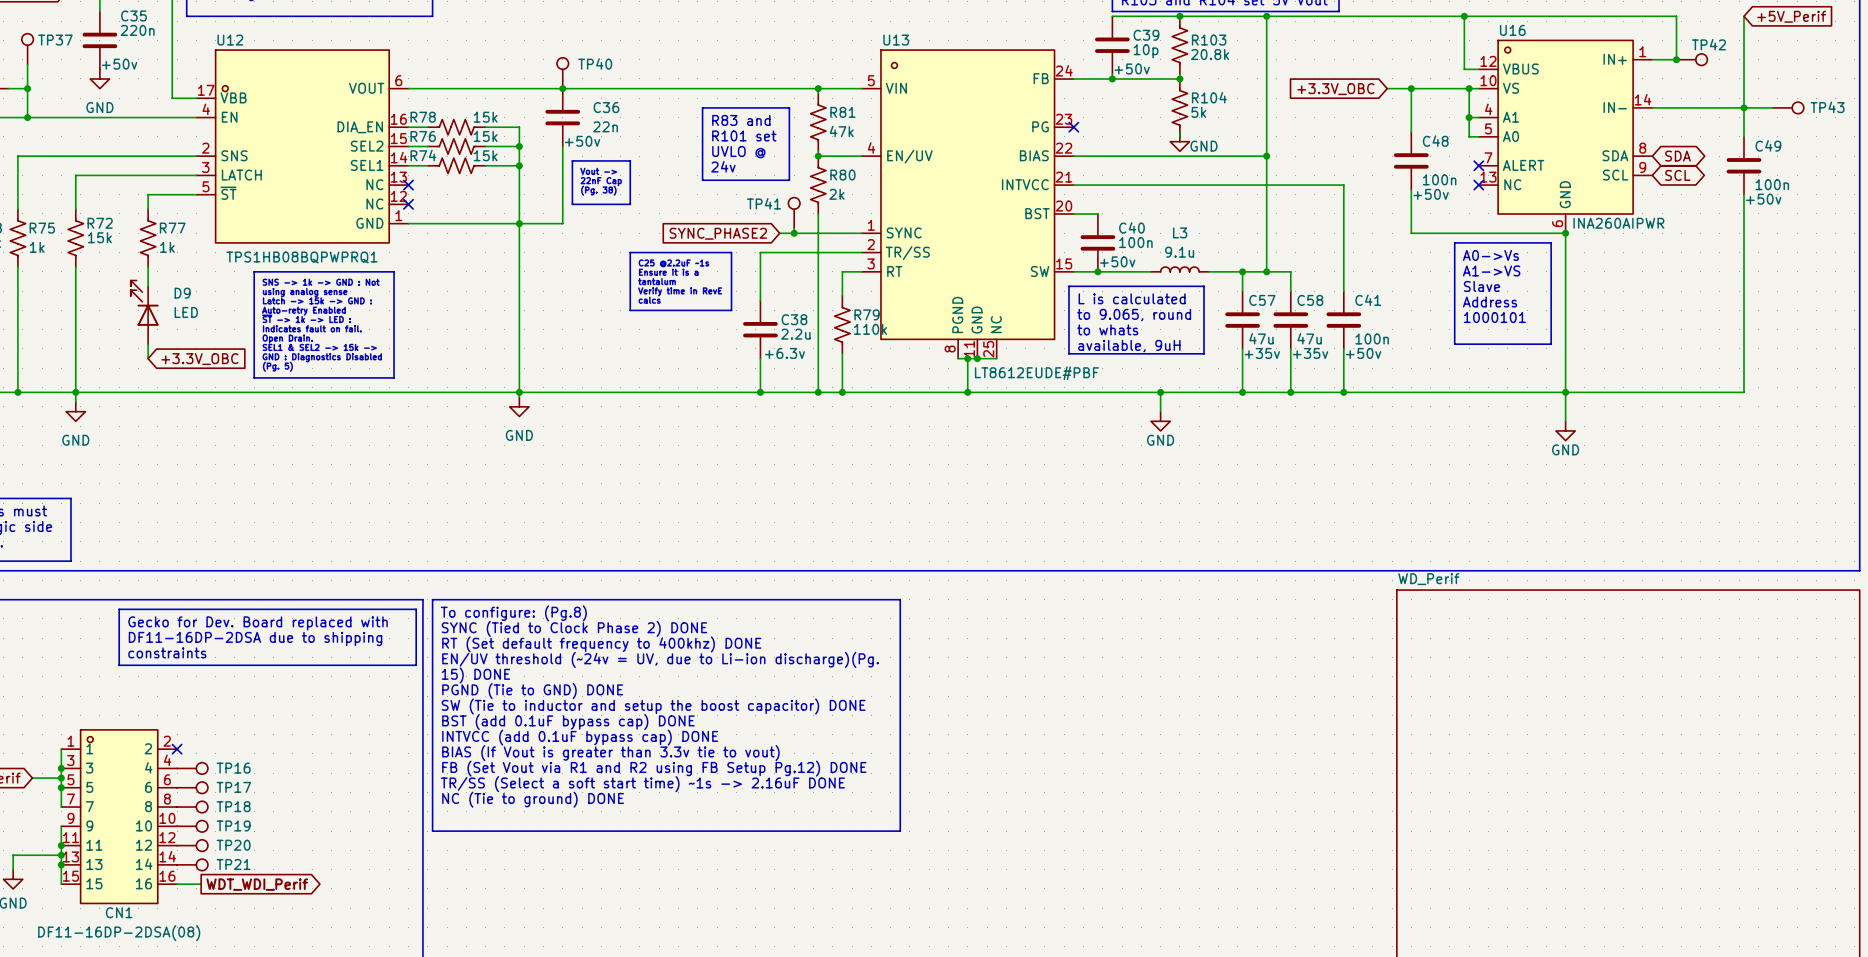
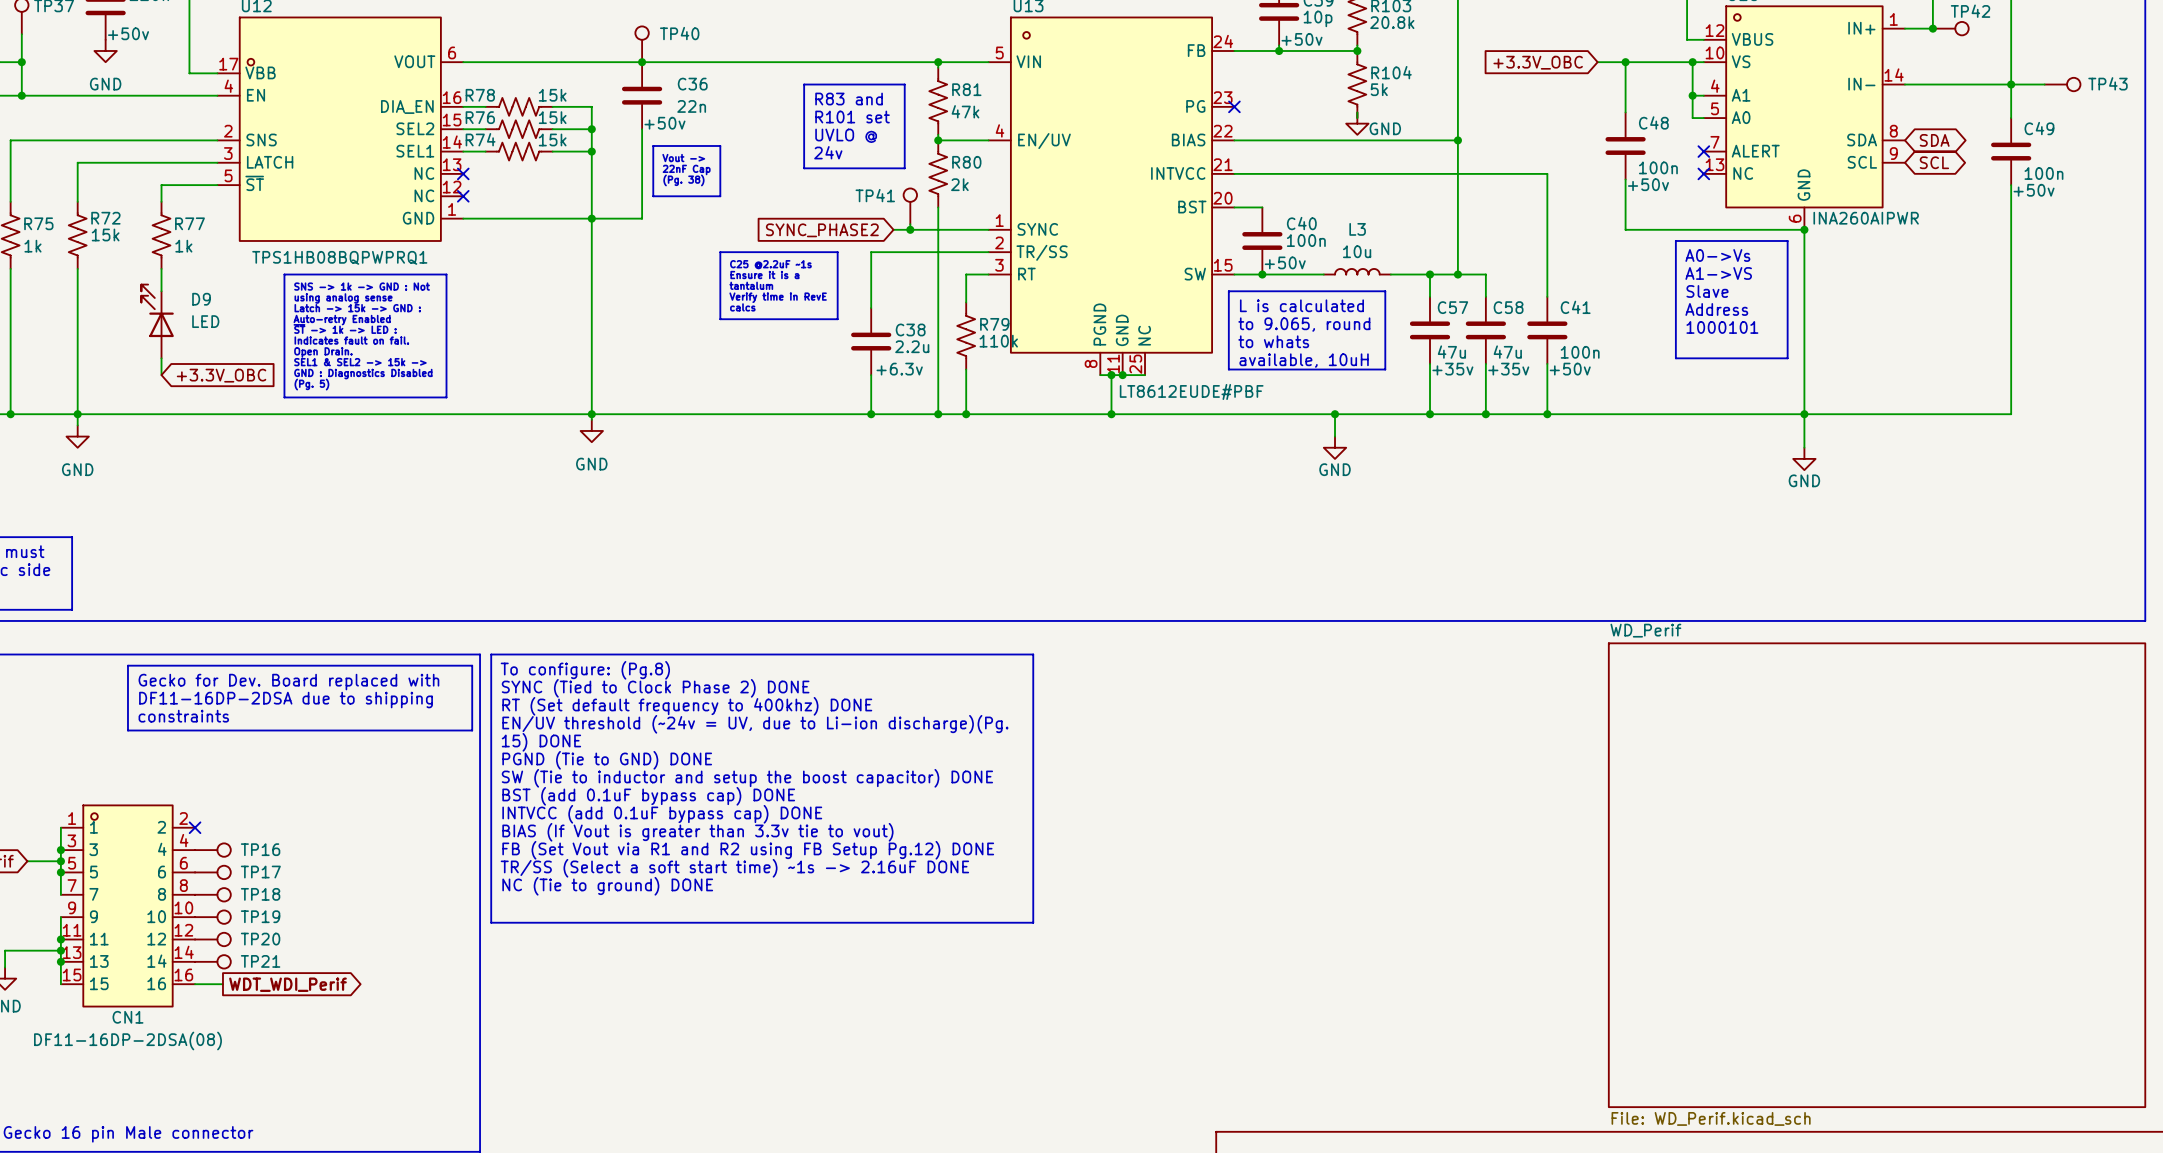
L3 value: 9.1u (1179, 252) -> 10u (1357, 251)
text: available, 9uH (1129, 346) -> available, 10uH (1304, 360)

